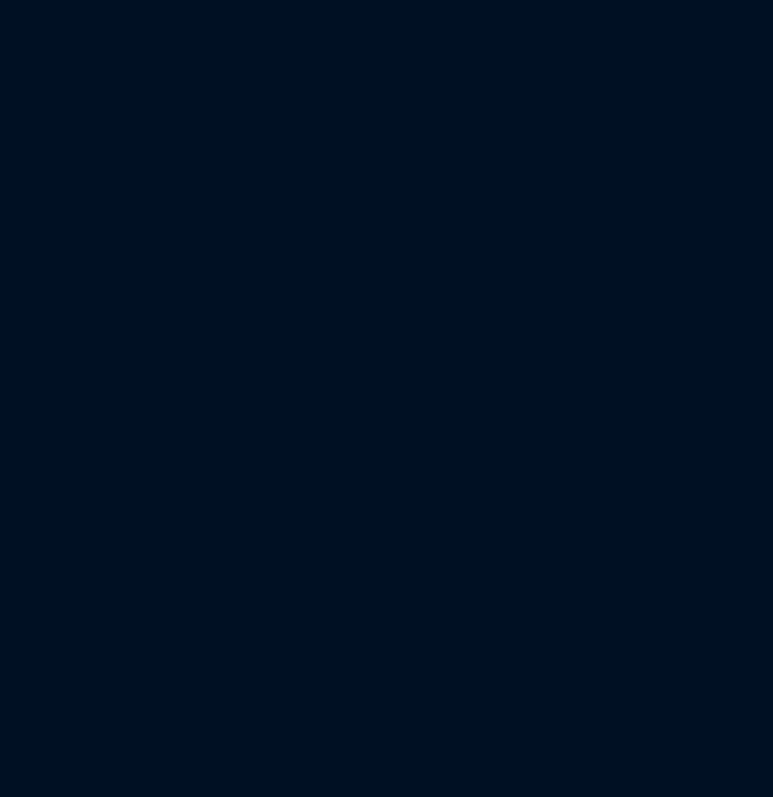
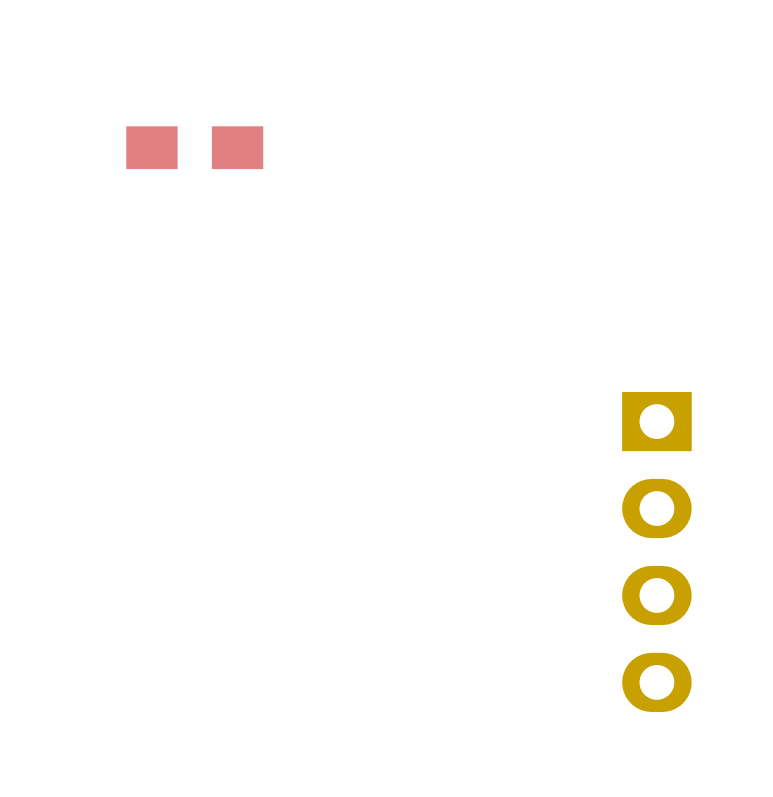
part: none -> (194, 147)
part: none -> (656, 551)

